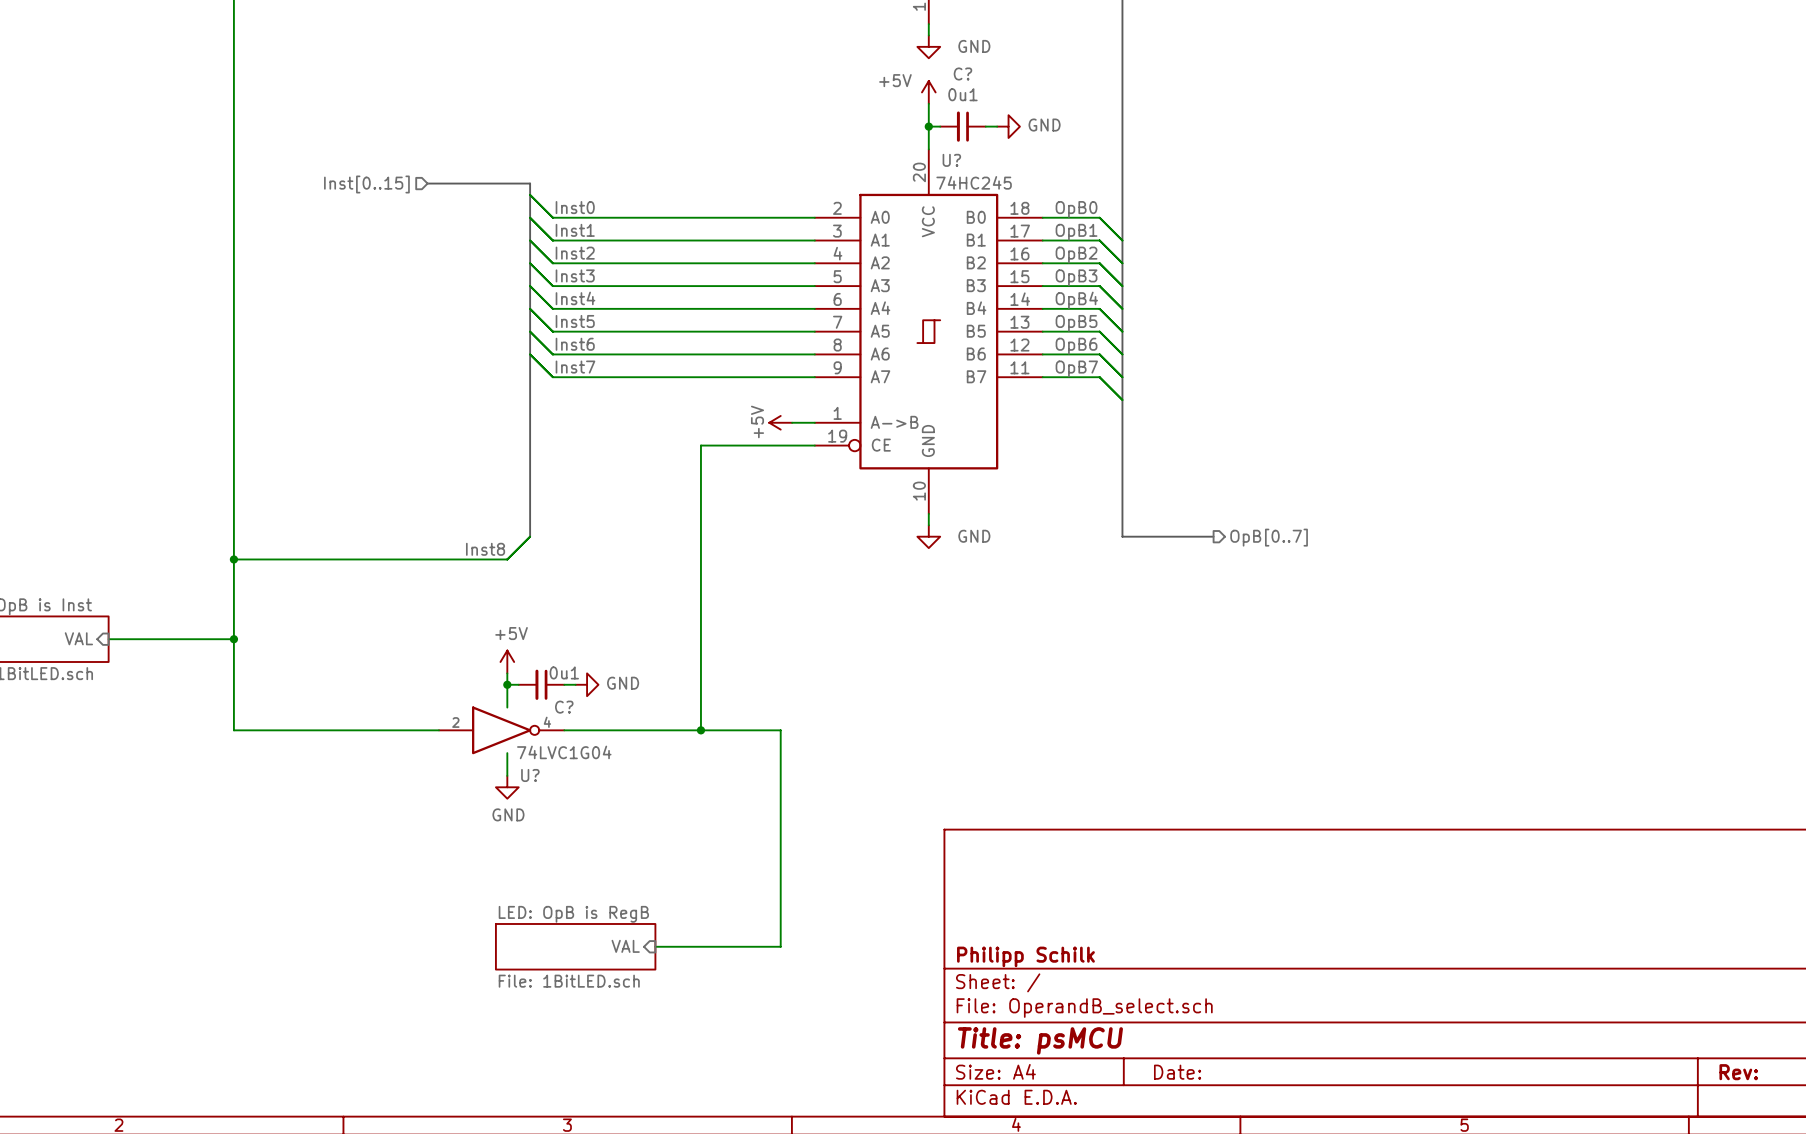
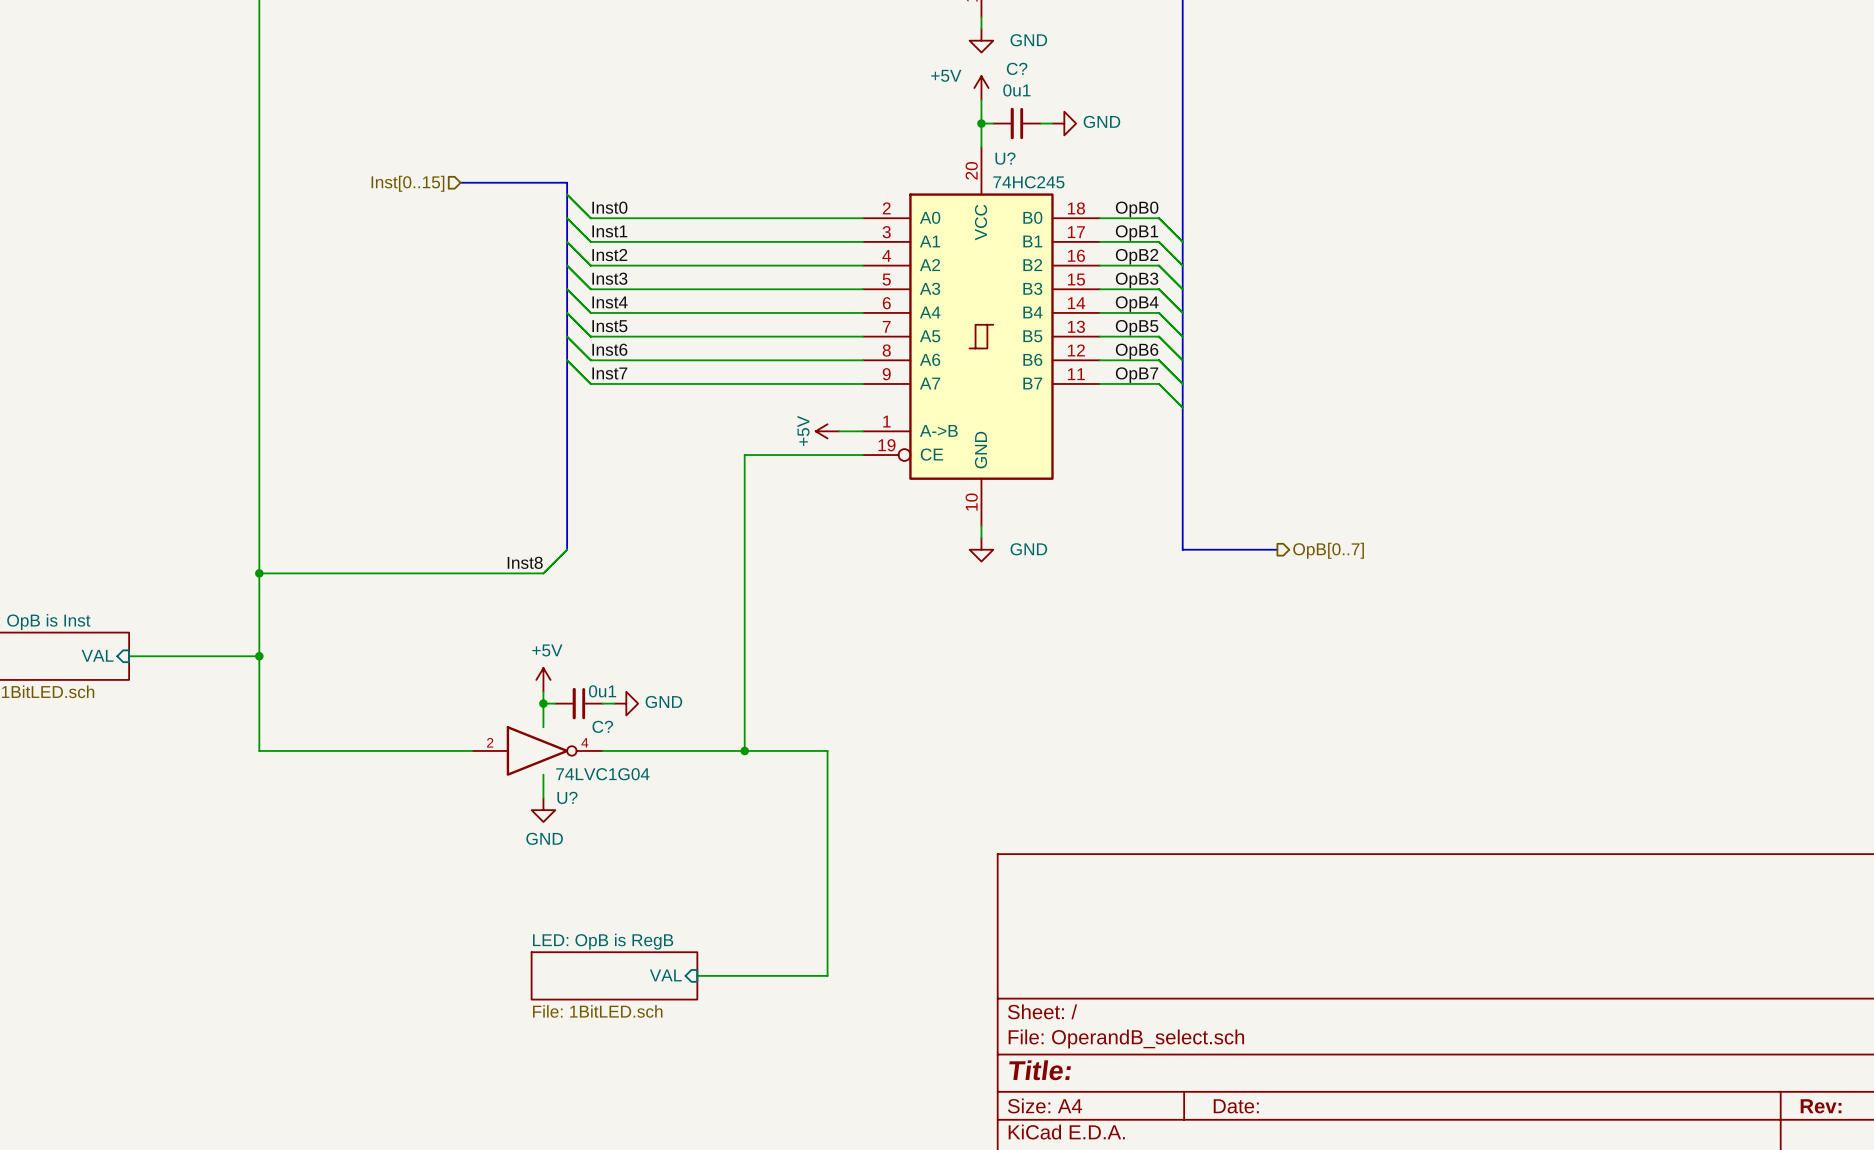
title block: Philipp Schilk (1025, 956) -> none
title block: Title: psMCU (1040, 1040) -> Title: (1040, 1070)

